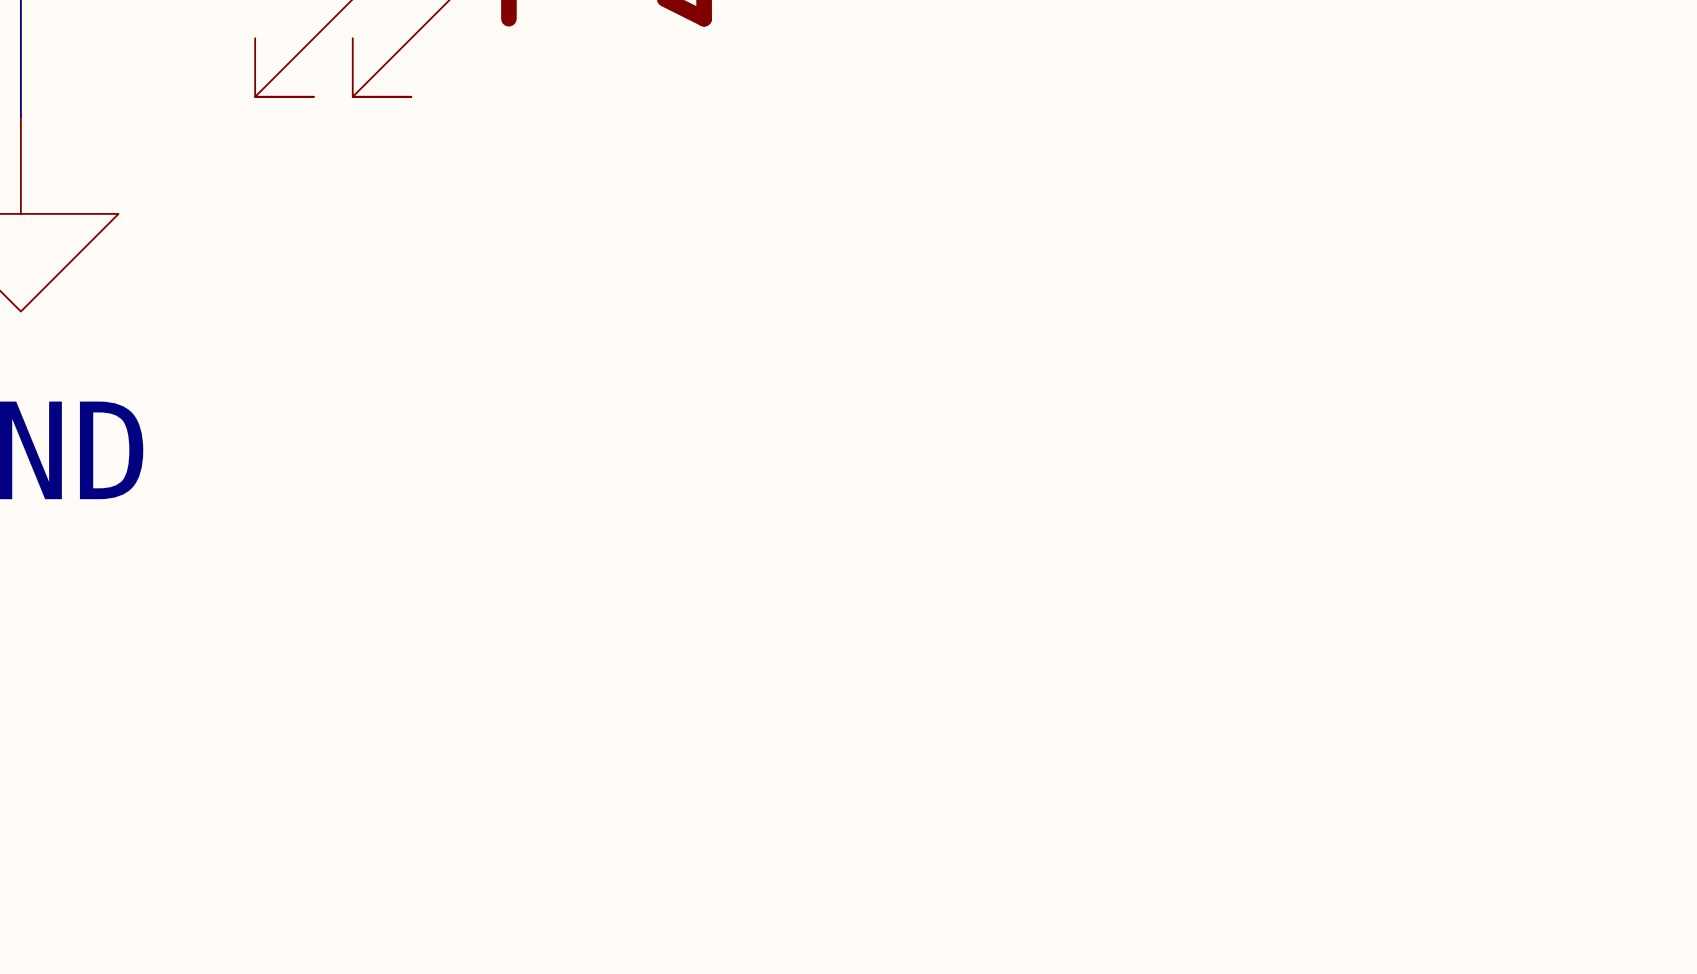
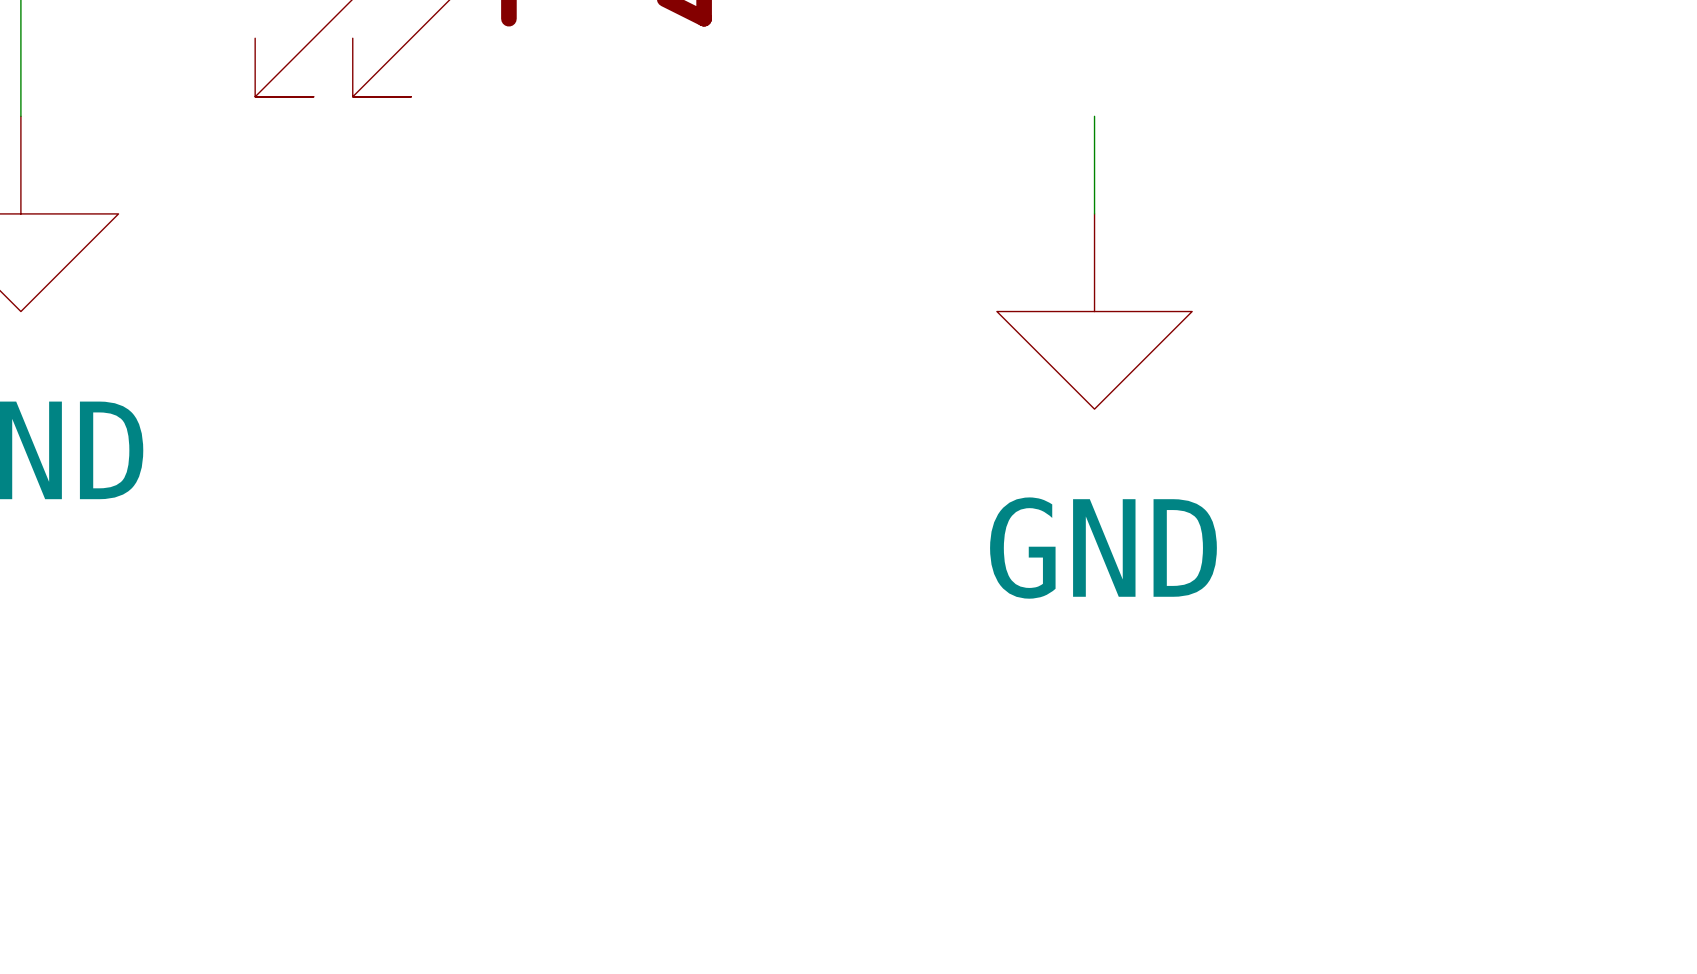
wire: none -> (1094, 116) (1094, 213)
power symbol: none -> GND (1094, 311)

